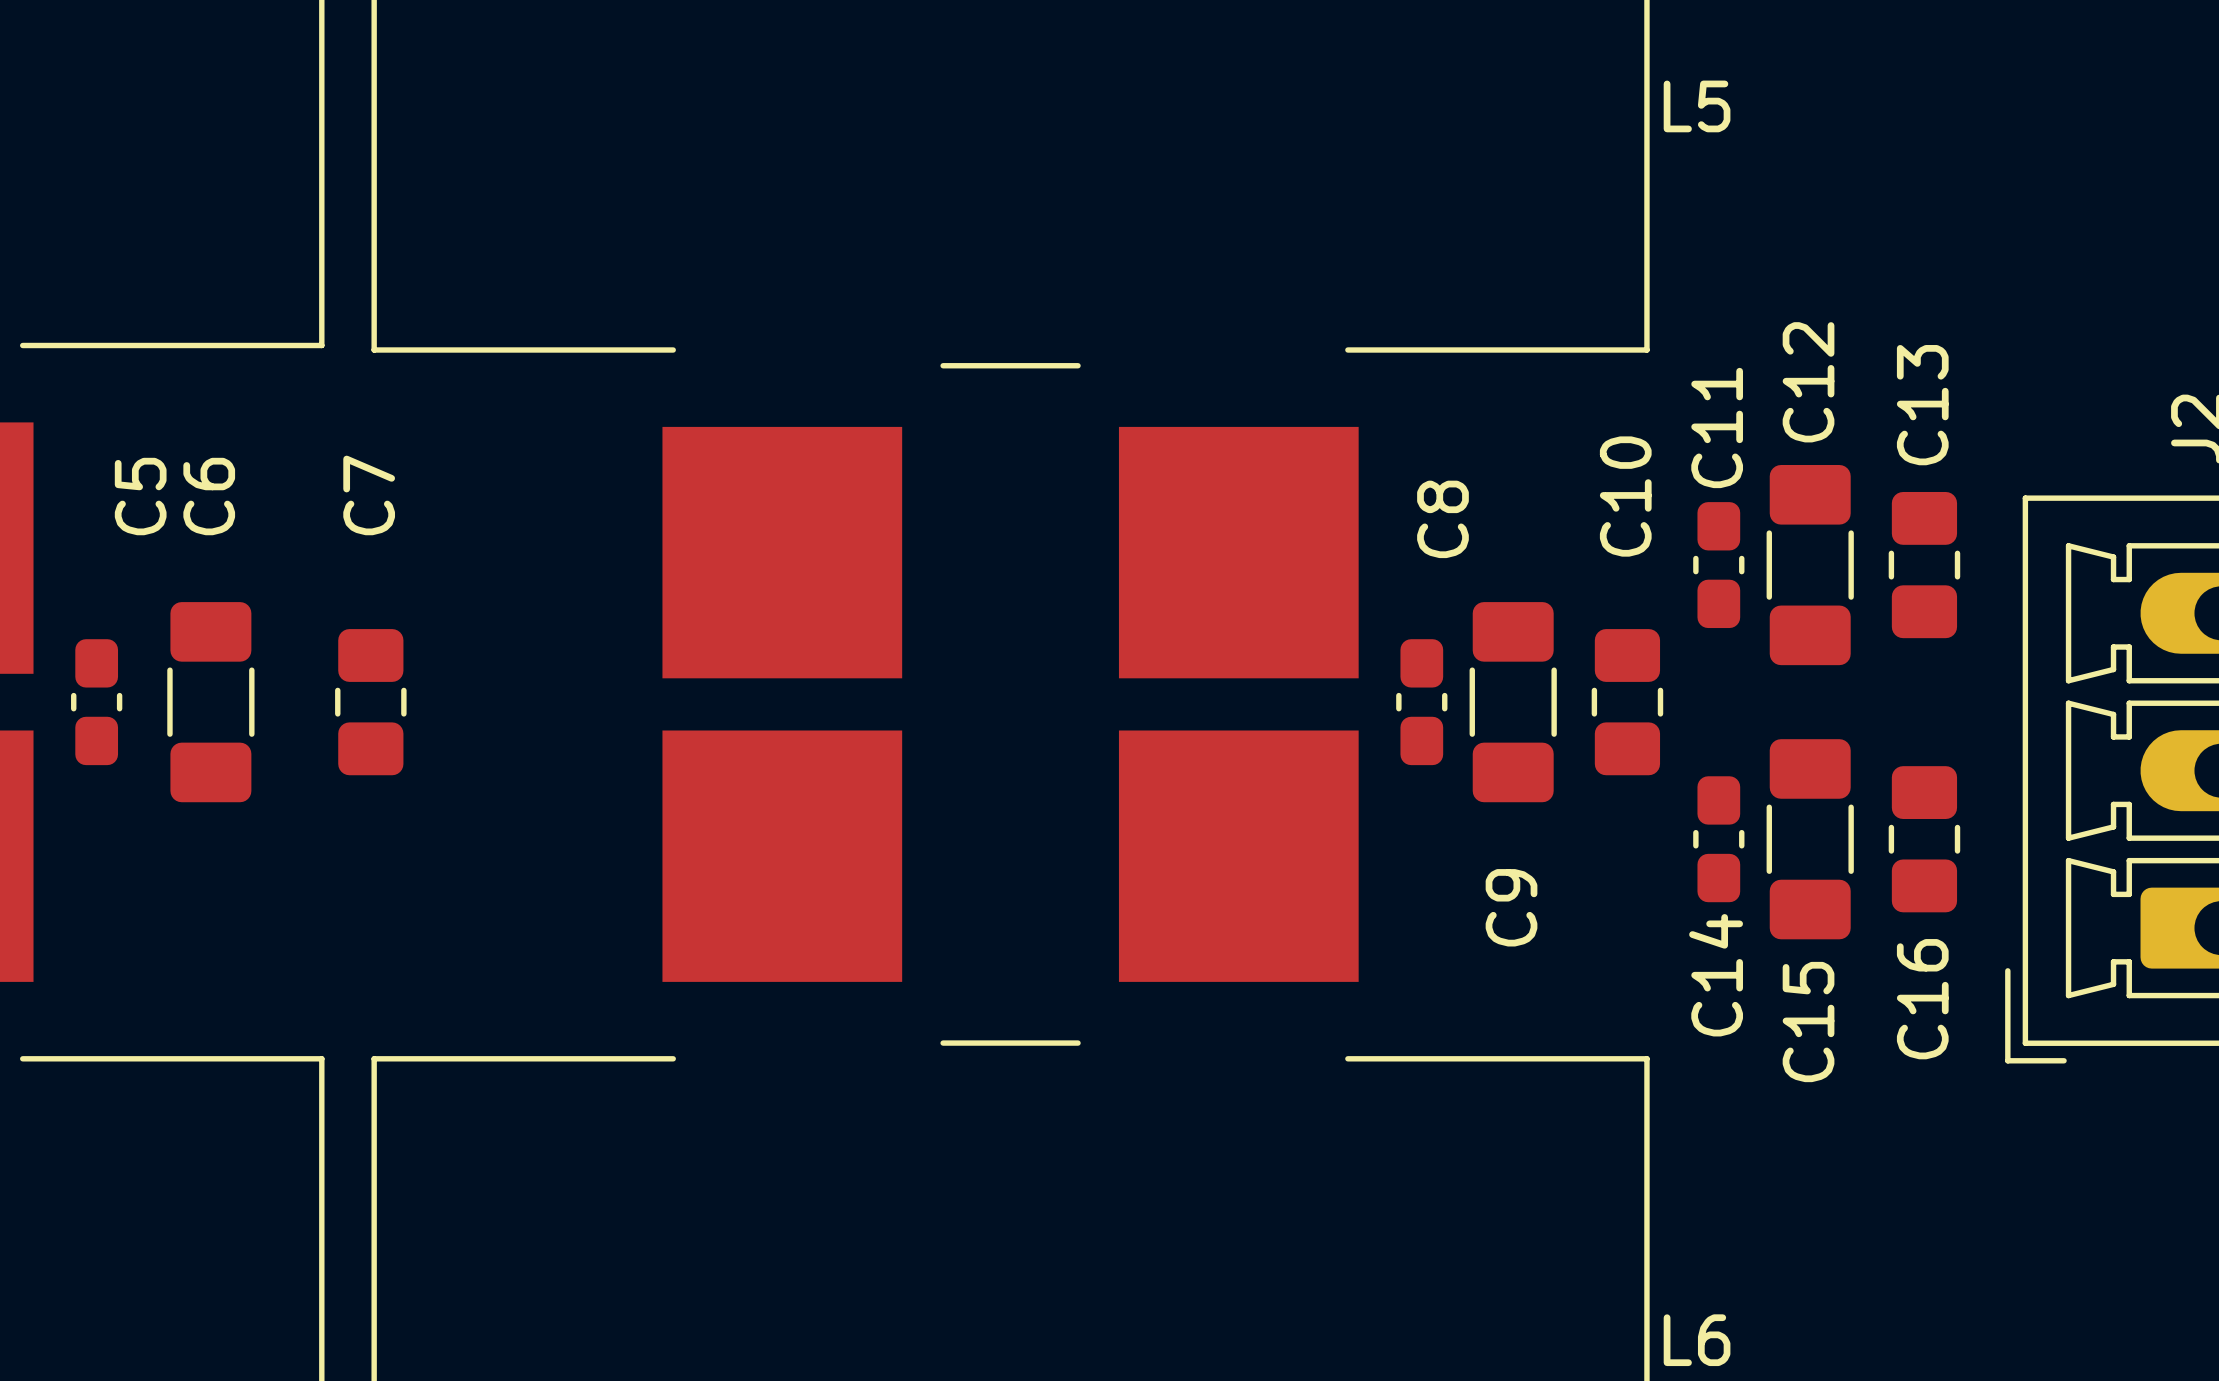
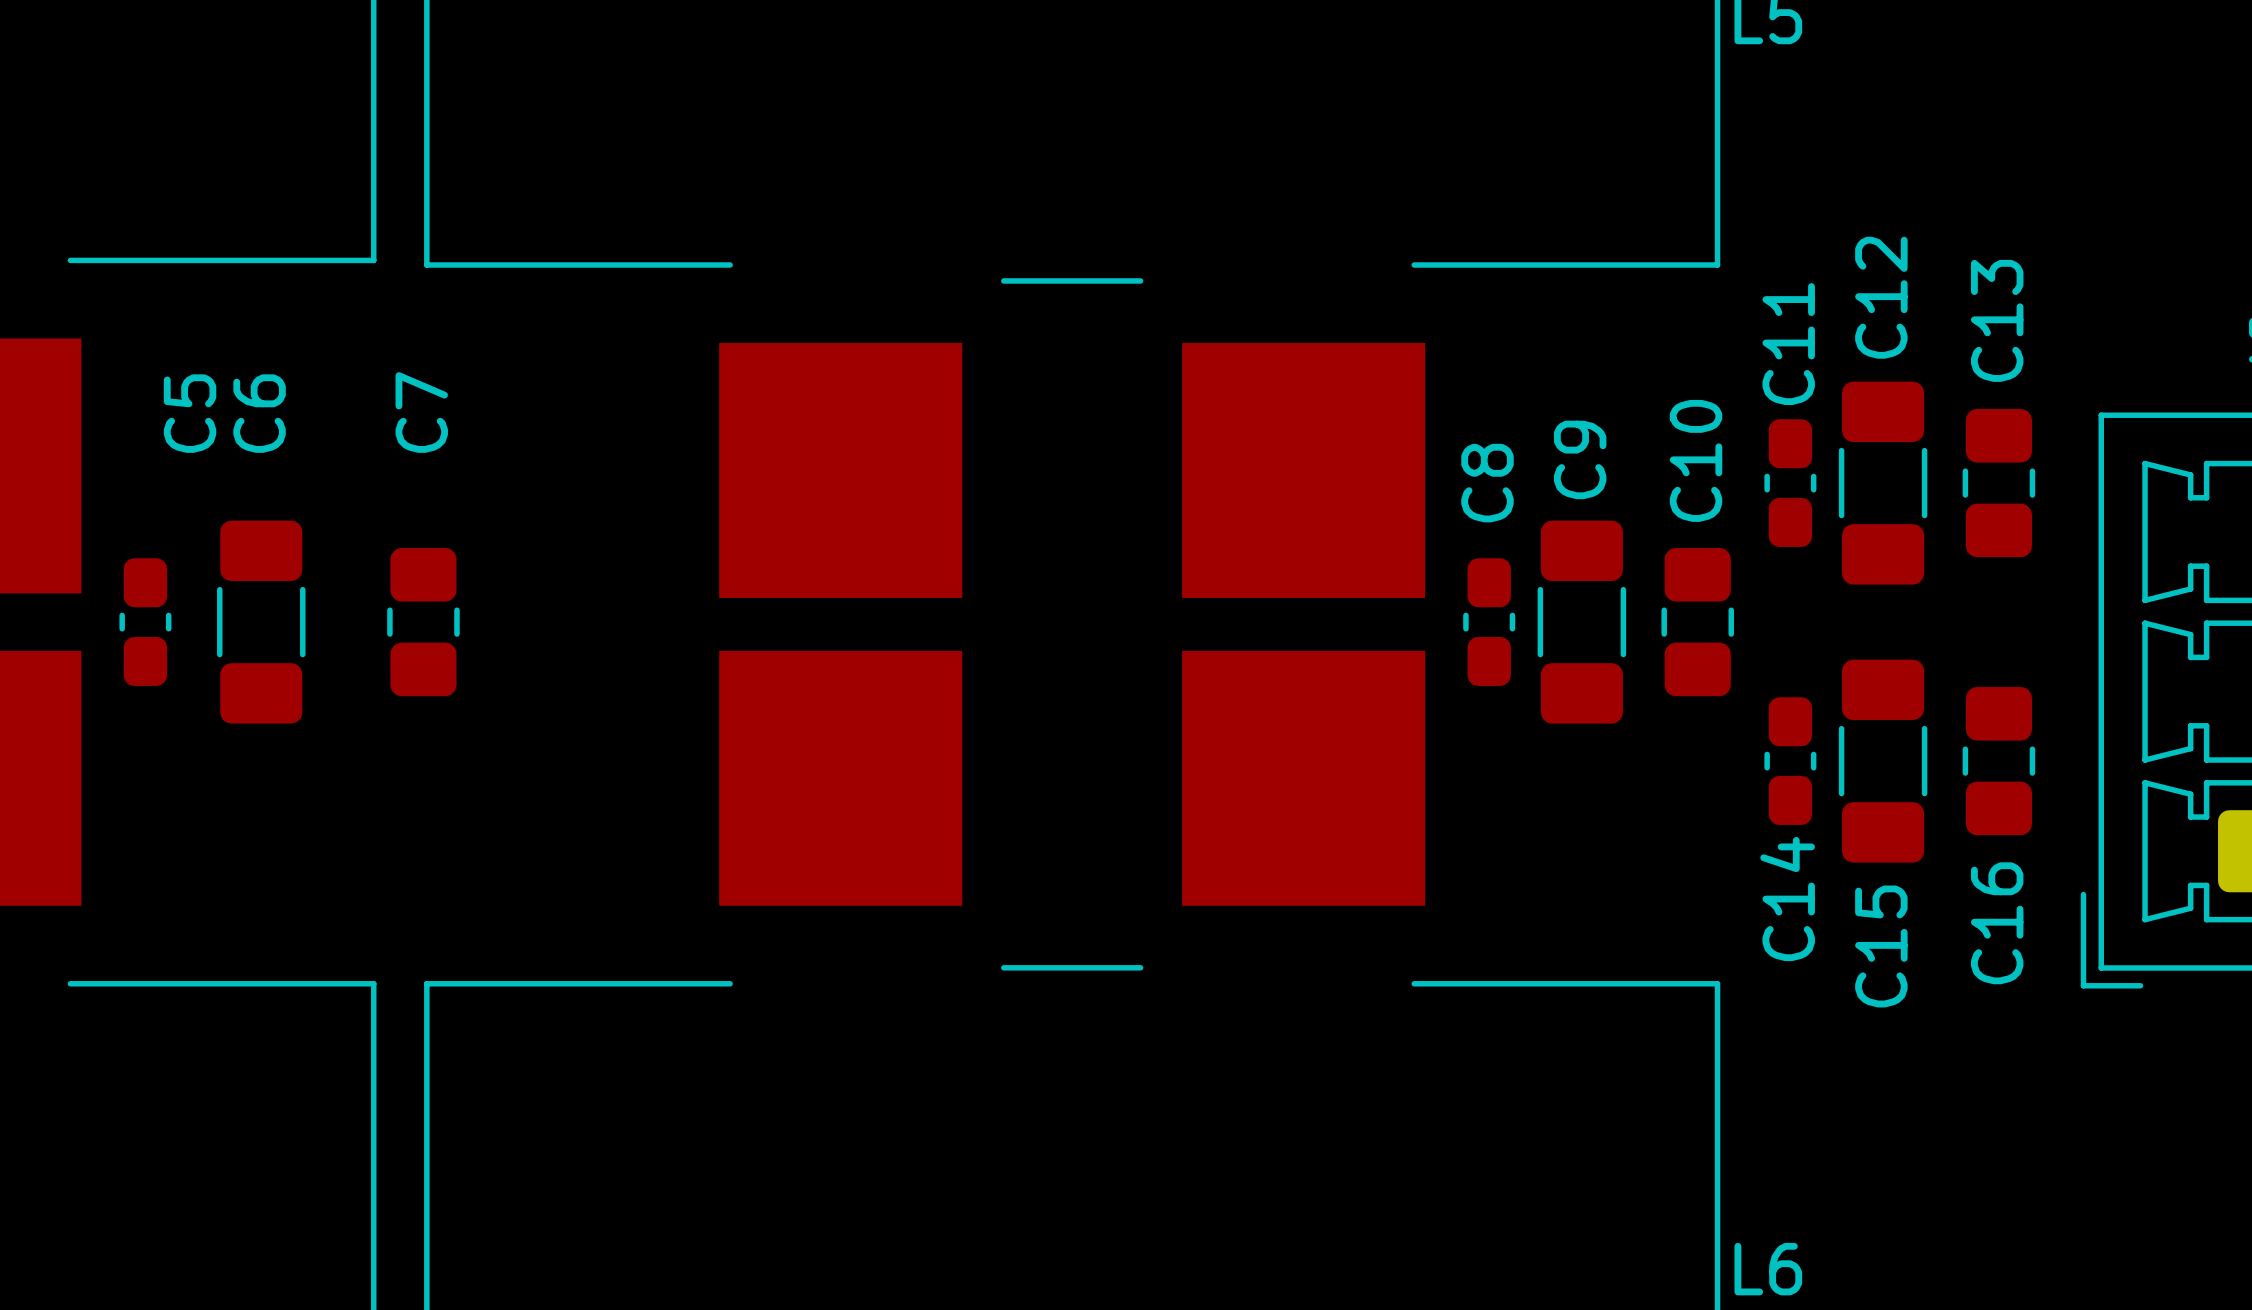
C10 name position: C10 (1625, 496) -> C10 (1696, 460)
C8 name position: C8 (1442, 519) -> C8 (1487, 483)
C9 name position: C9 (1511, 907) -> C9 (1580, 459)

